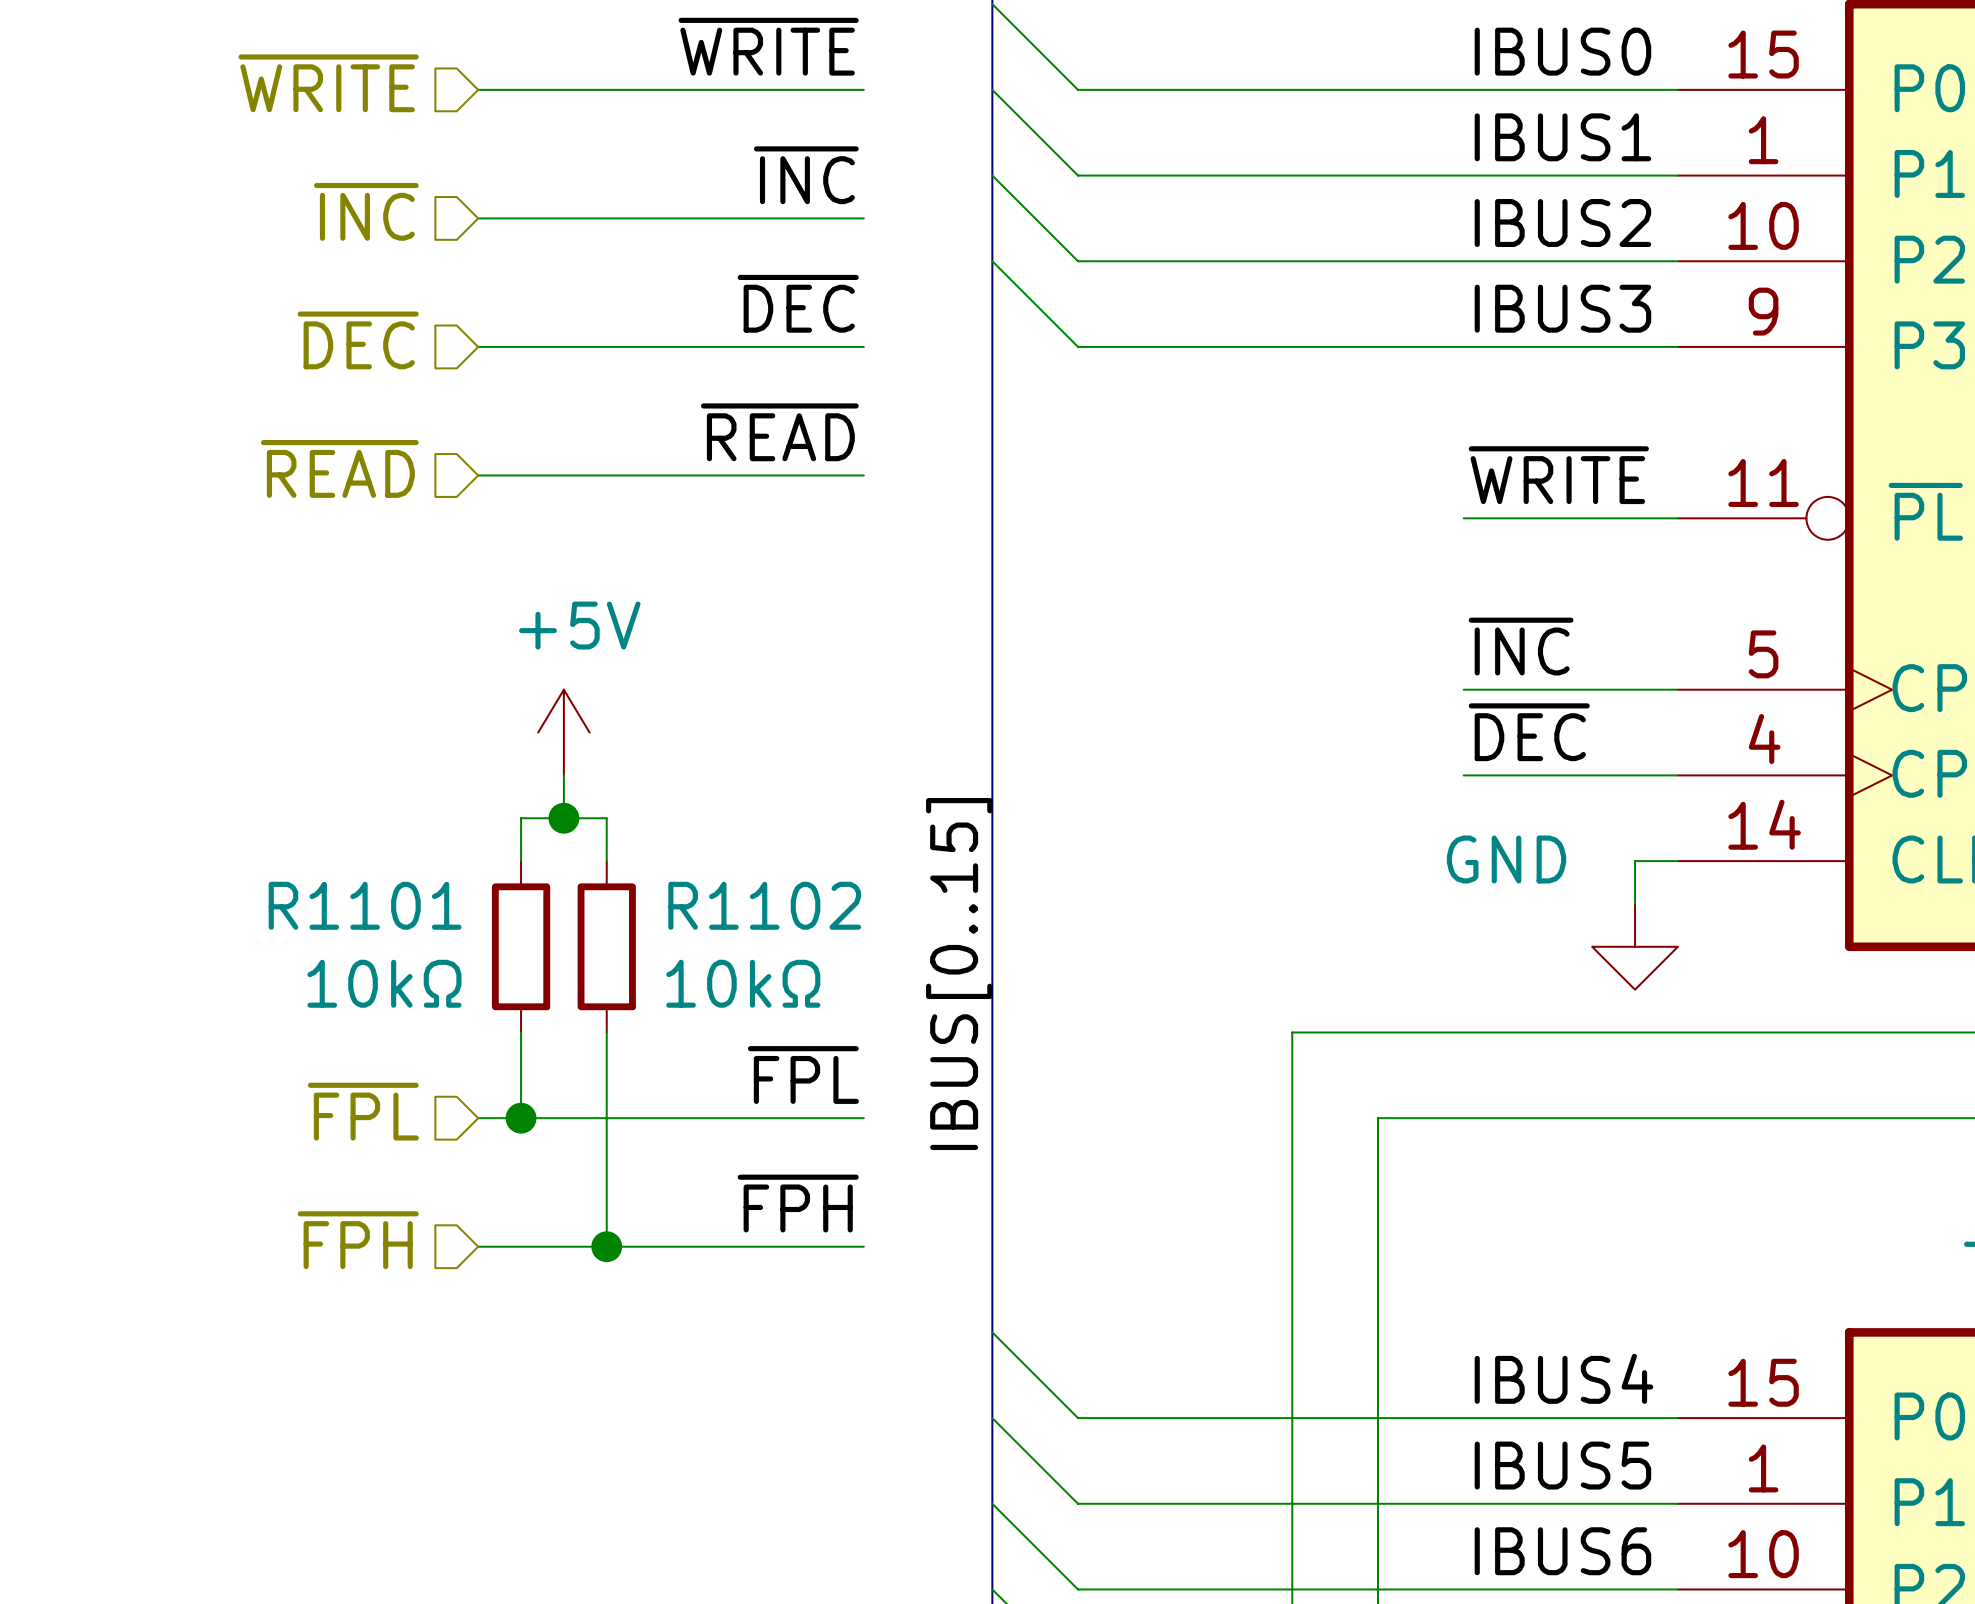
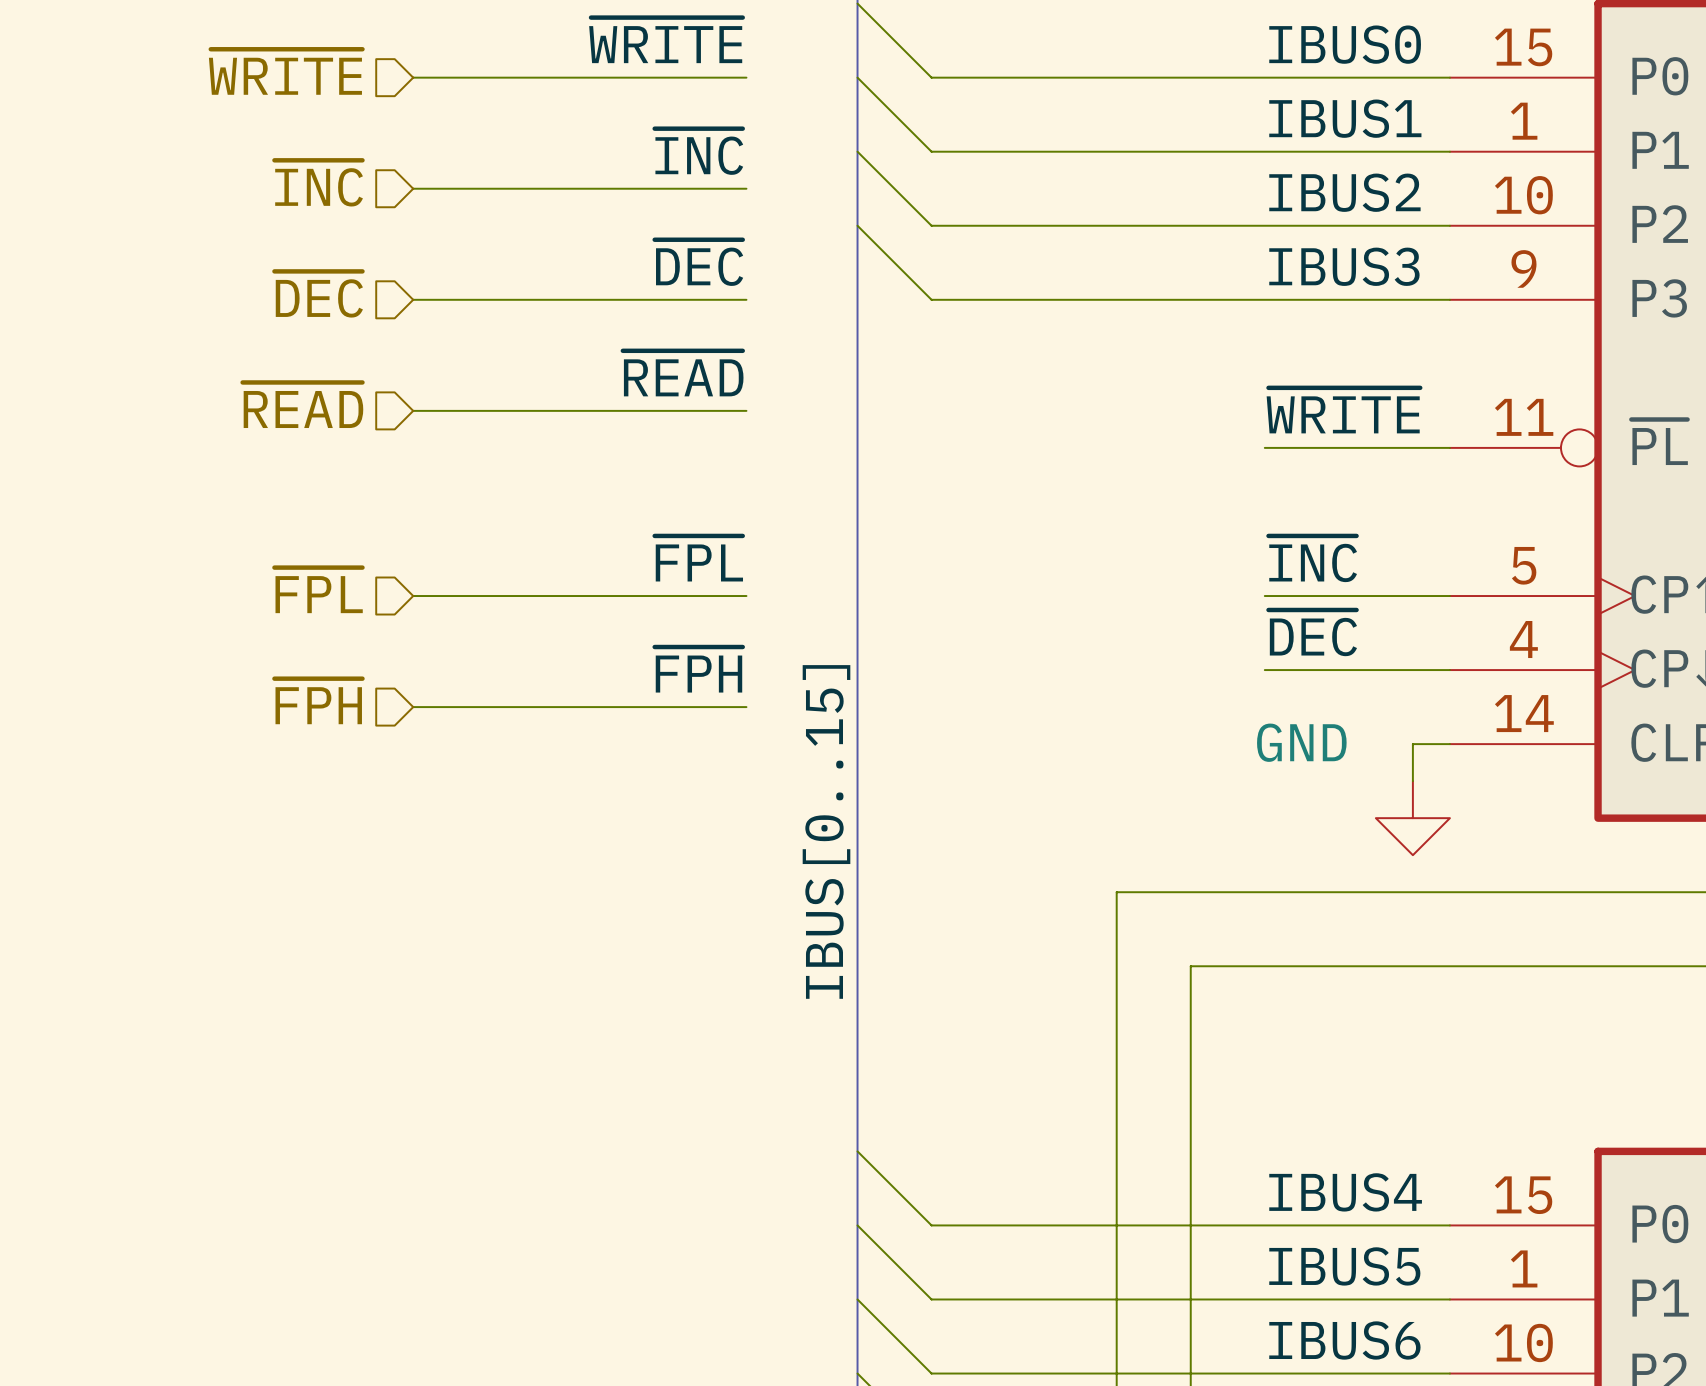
power symbol: +5V (563, 732) -> none
wire: (563, 775) (563, 818) -> none
wire: (521, 818) (521, 861) -> (450, 707) (413, 707)
junction: (563, 818) -> none
wire: (606, 818) (606, 861) -> (524, 707) (746, 707)
R1101: 10kΩ (521, 946) -> none
R1102: 10kΩ (606, 946) -> none
wire: (521, 1032) (521, 1118) -> none
wire: (606, 1032) (606, 1246) -> none
label position: ~{FPL} (803, 1075) -> ~{FPL} (698, 558)
hierarchical label position: ~{FPL} (363, 1111) -> ~{FPL} (318, 590)
wire: (478, 1118) (863, 1118) -> (413, 596) (746, 596)
junction: (521, 1118) -> none
label position: ~{FPH} (798, 1203) -> ~{FPH} (698, 669)
hierarchical label position: ~{FPH} (358, 1240) -> ~{FPH} (318, 701)
wire: (478, 1246) (863, 1246) -> none
junction: (606, 1246) -> none

